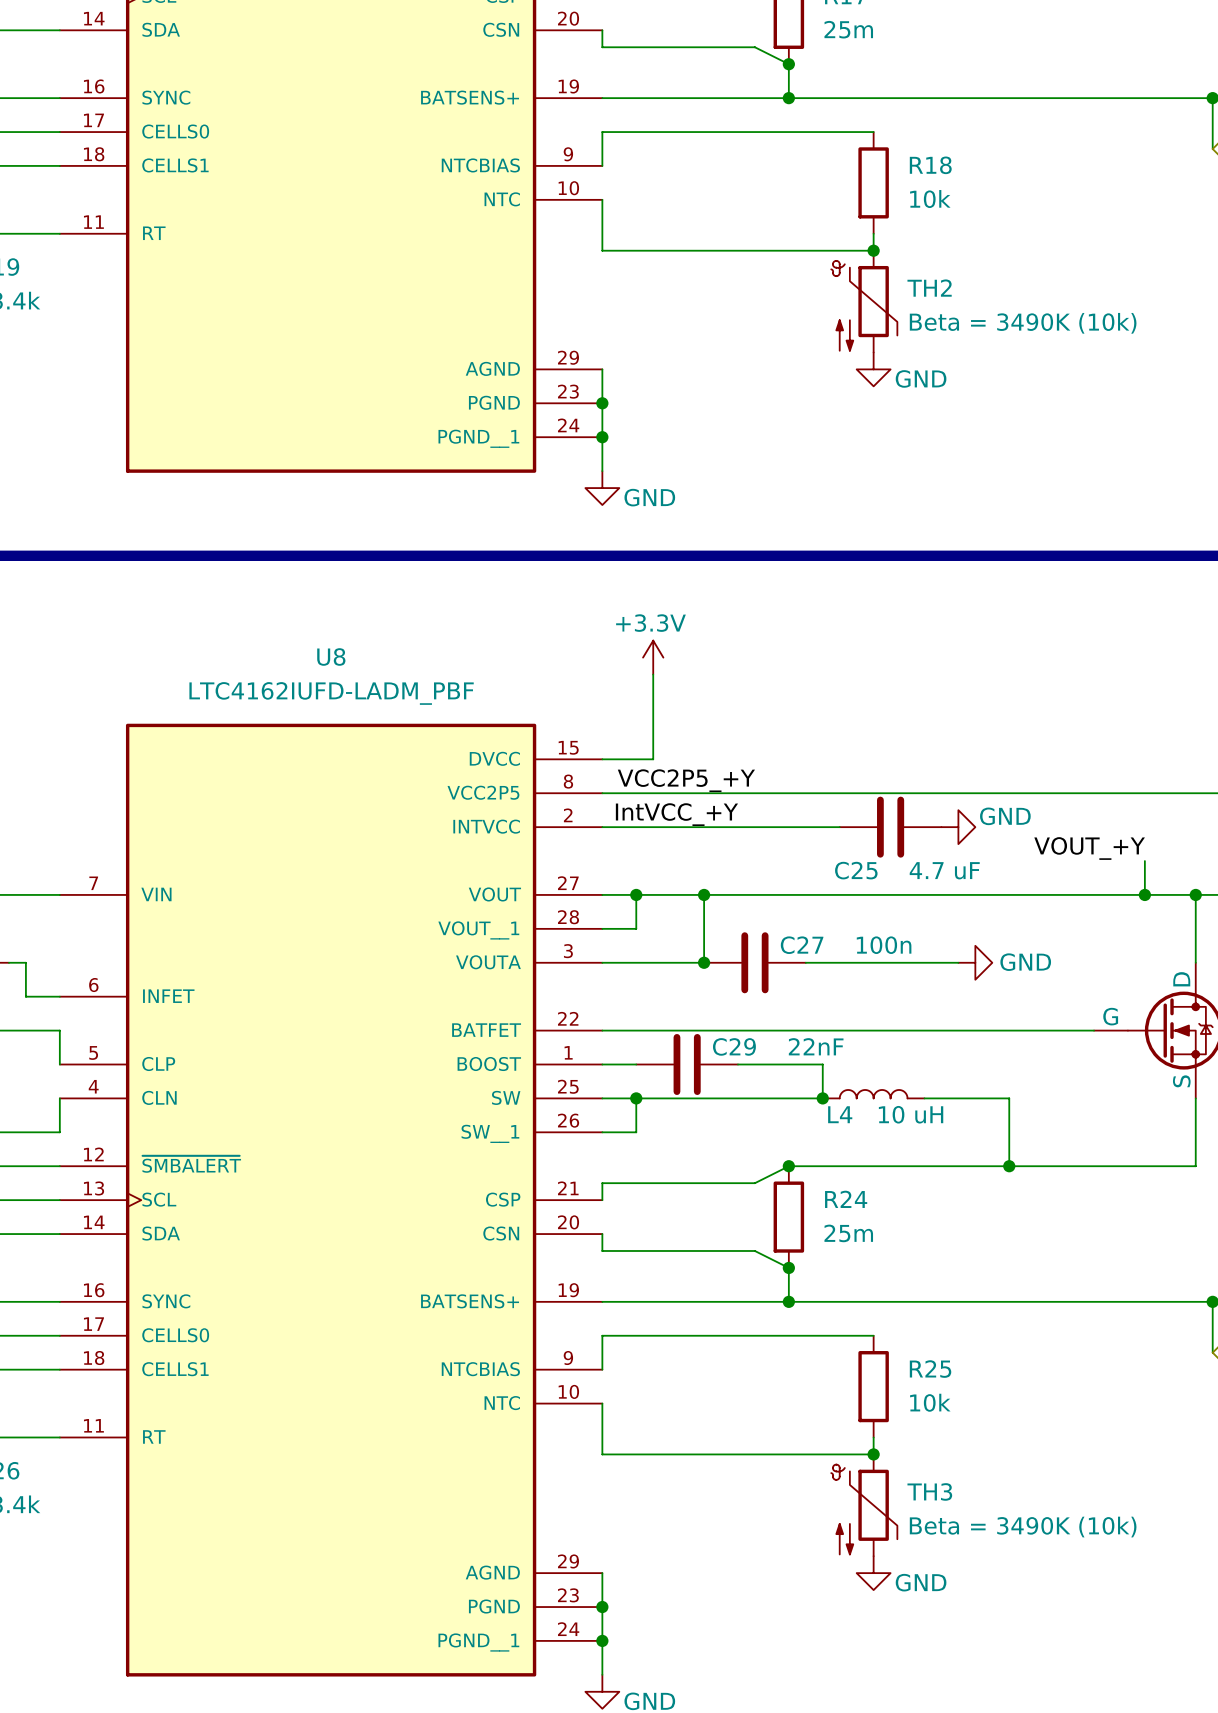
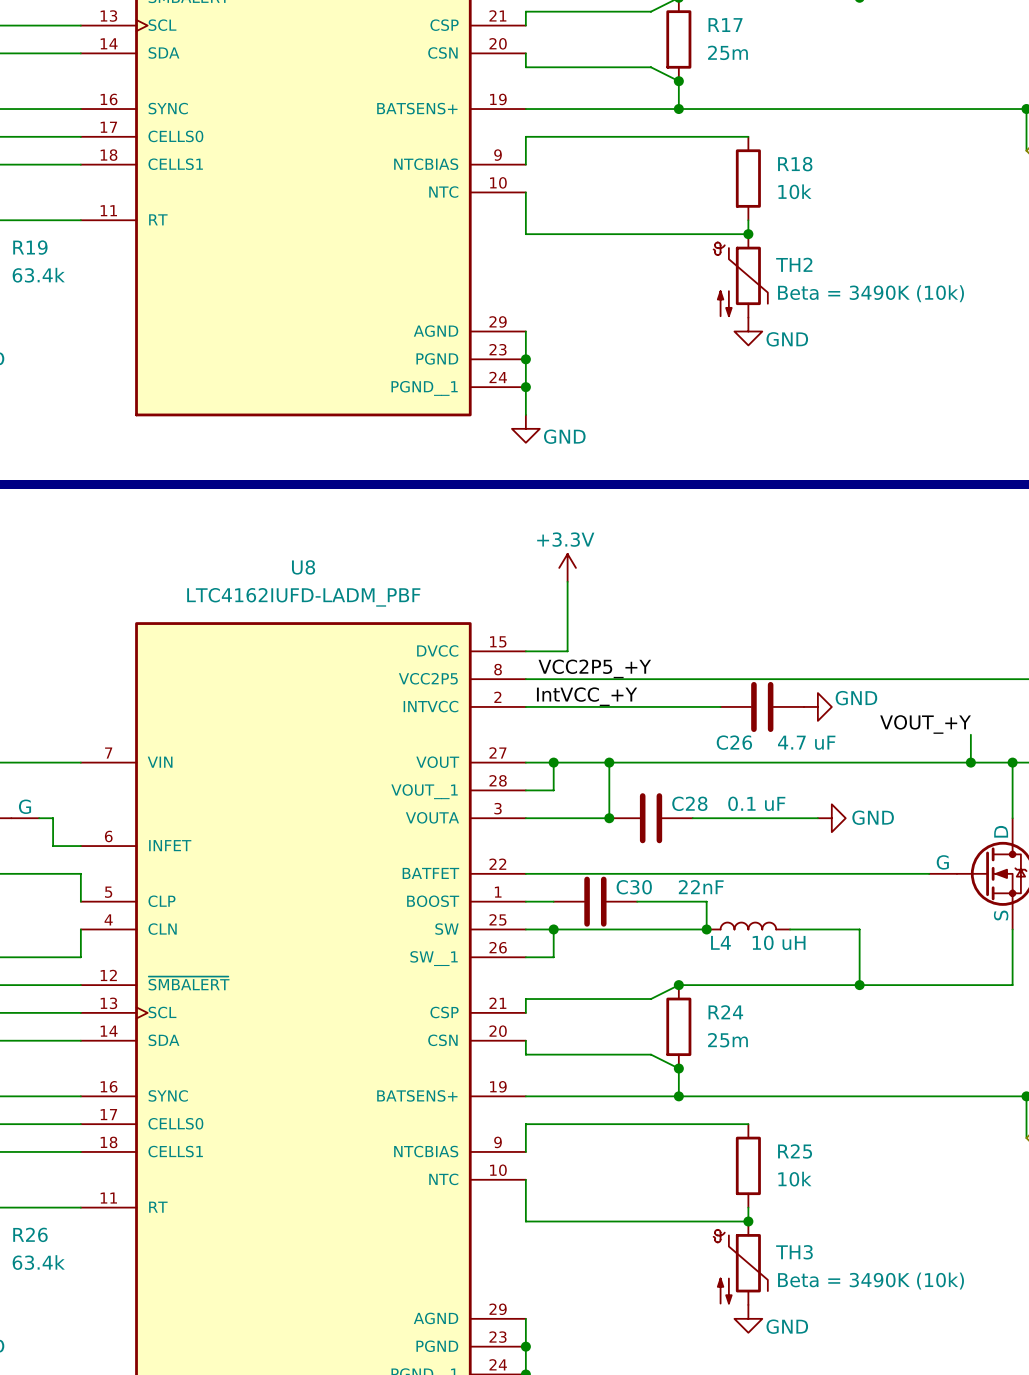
C25 name: C25 (856, 870) -> C26 (734, 742)
C27 name: C27 (802, 945) -> C28 (689, 803)
C27 value: 100n (884, 945) -> 0.1 uF (756, 803)
C29 name: C29 (734, 1046) -> C30 (634, 887)

